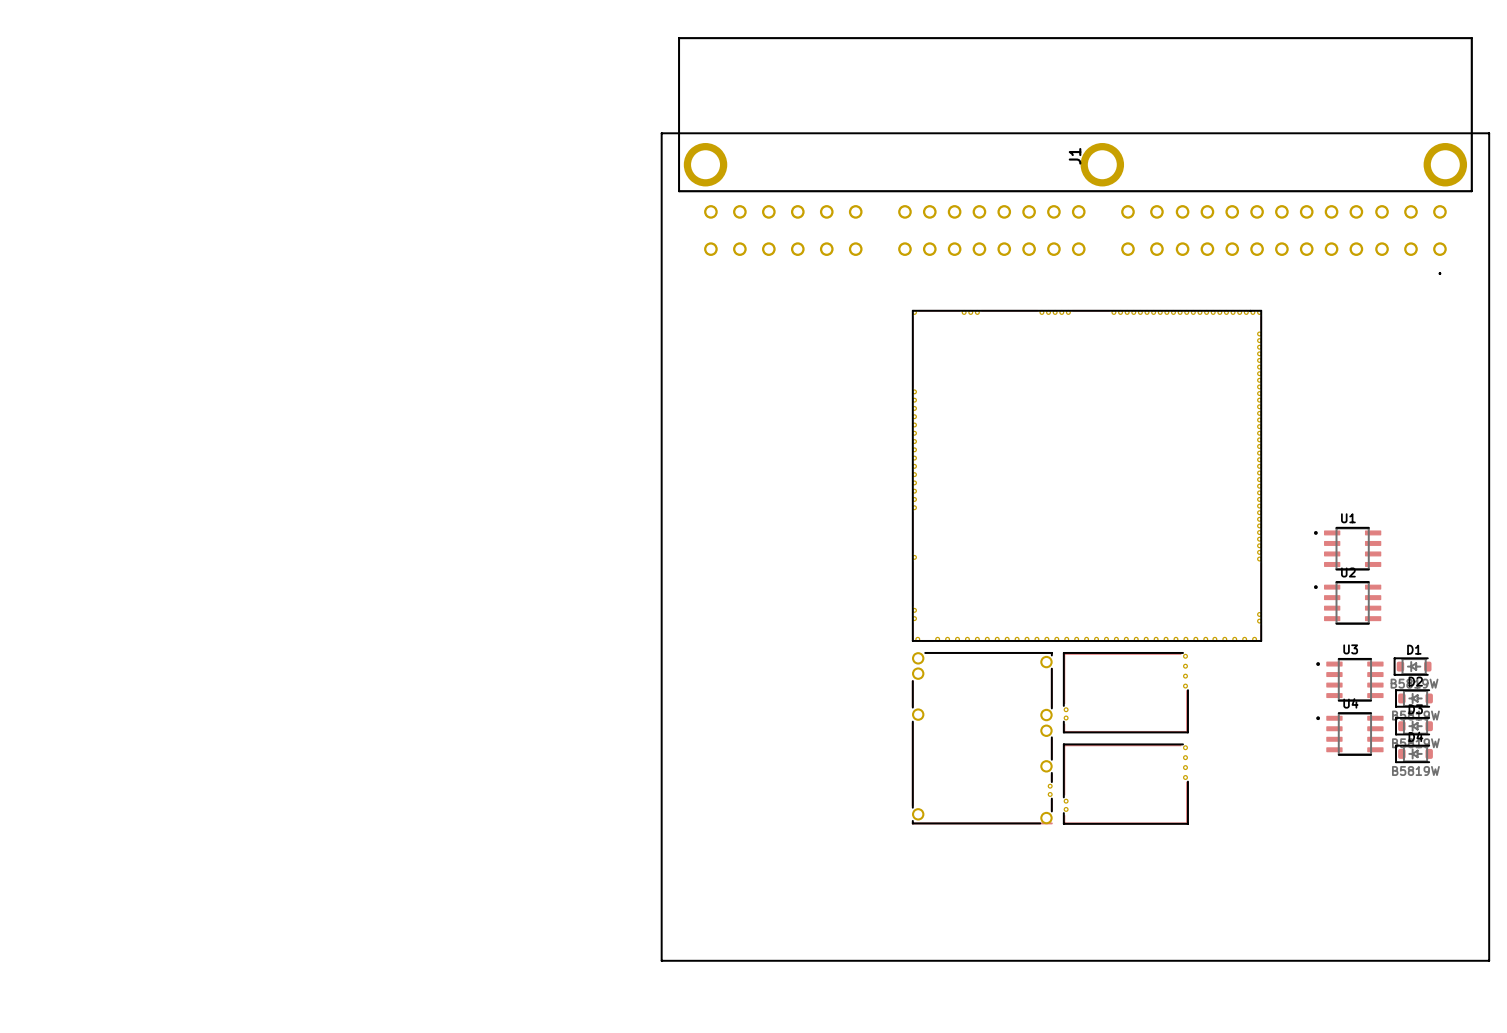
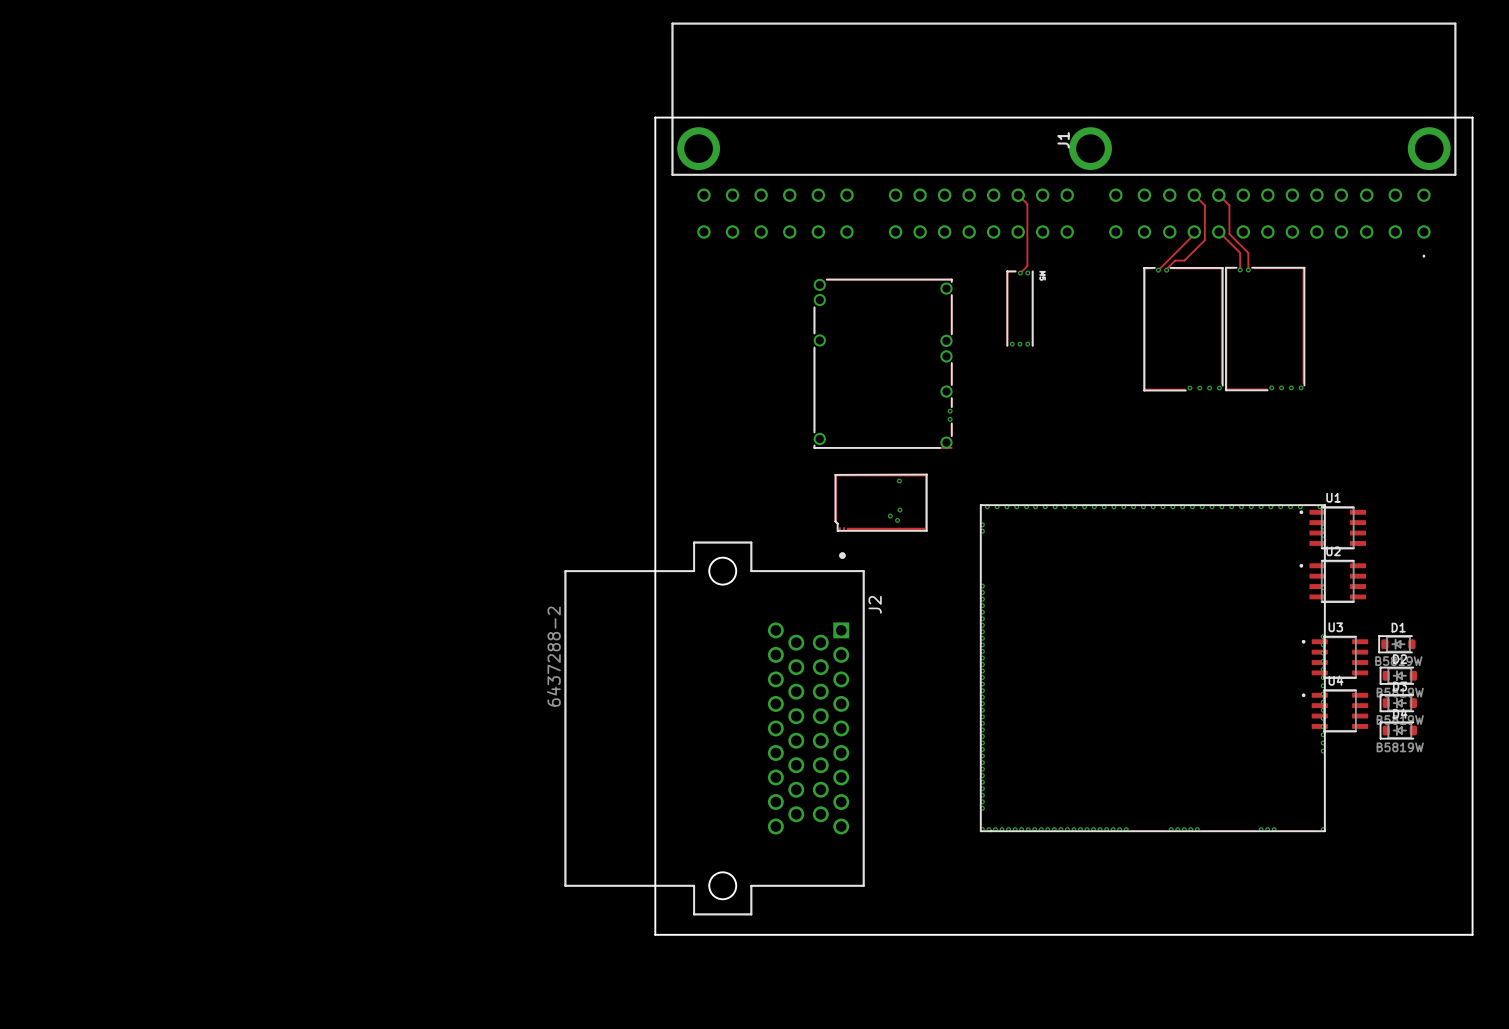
track: none -> (1018, 195) (1027, 203) (1027, 266) (1020, 273)
track: none -> (1194, 195) (1204, 205) (1204, 240) (1184, 260) (1175, 260) (1166, 270)
track: none -> (1219, 195) (1229, 205) (1229, 234) (1248, 252) (1248, 269)
track: none -> (1194, 231) (1158, 270)
track: none -> (1219, 231) (1240, 252) (1240, 269)
part: none -> (1020, 308)
part: none -> (1183, 329)
part: none -> (1265, 329)
part: none -> (883, 363)
part: (1087, 475) -> none
part: none -> (881, 502)
part: none -> (1152, 668)
part: (1125, 692) -> none
part: (982, 738) -> none
J2: none -> 6437288-2 (714, 728)
part: (1125, 784) -> none

